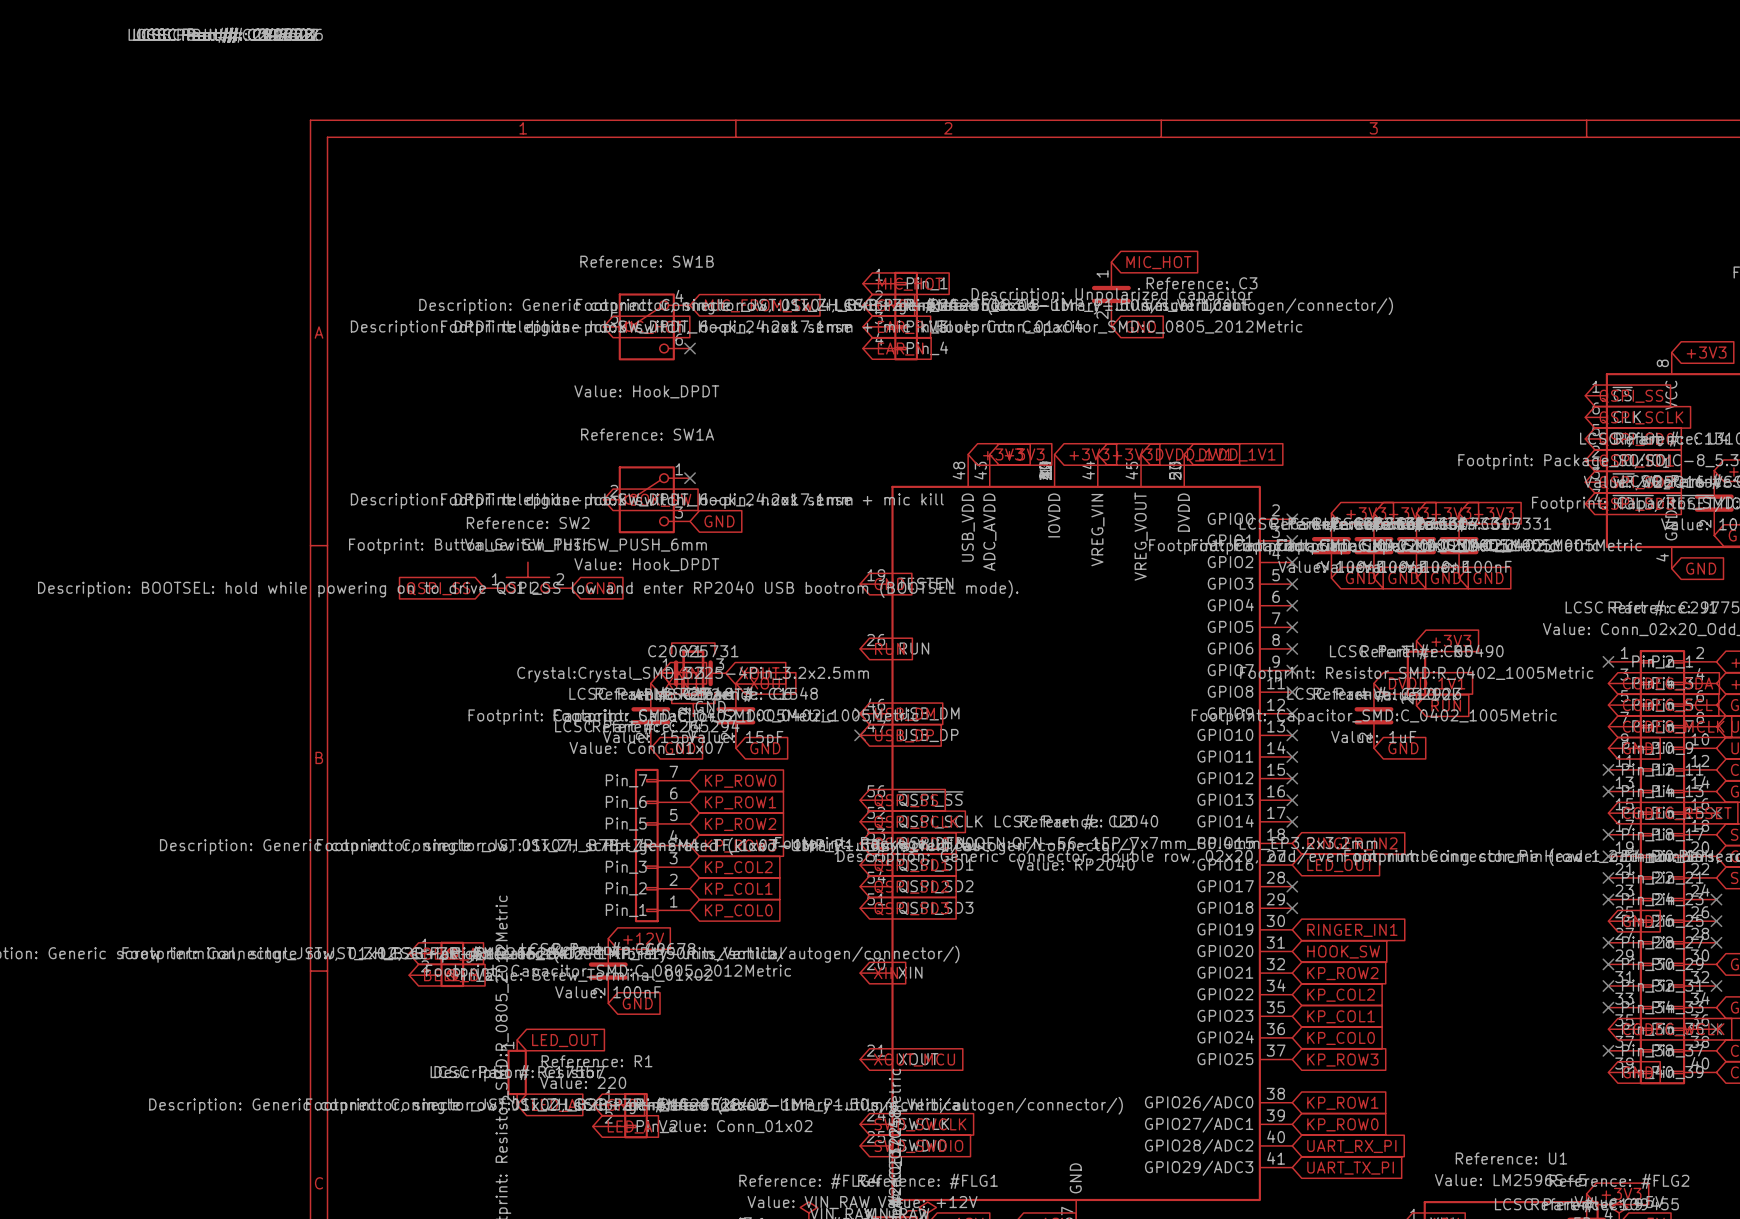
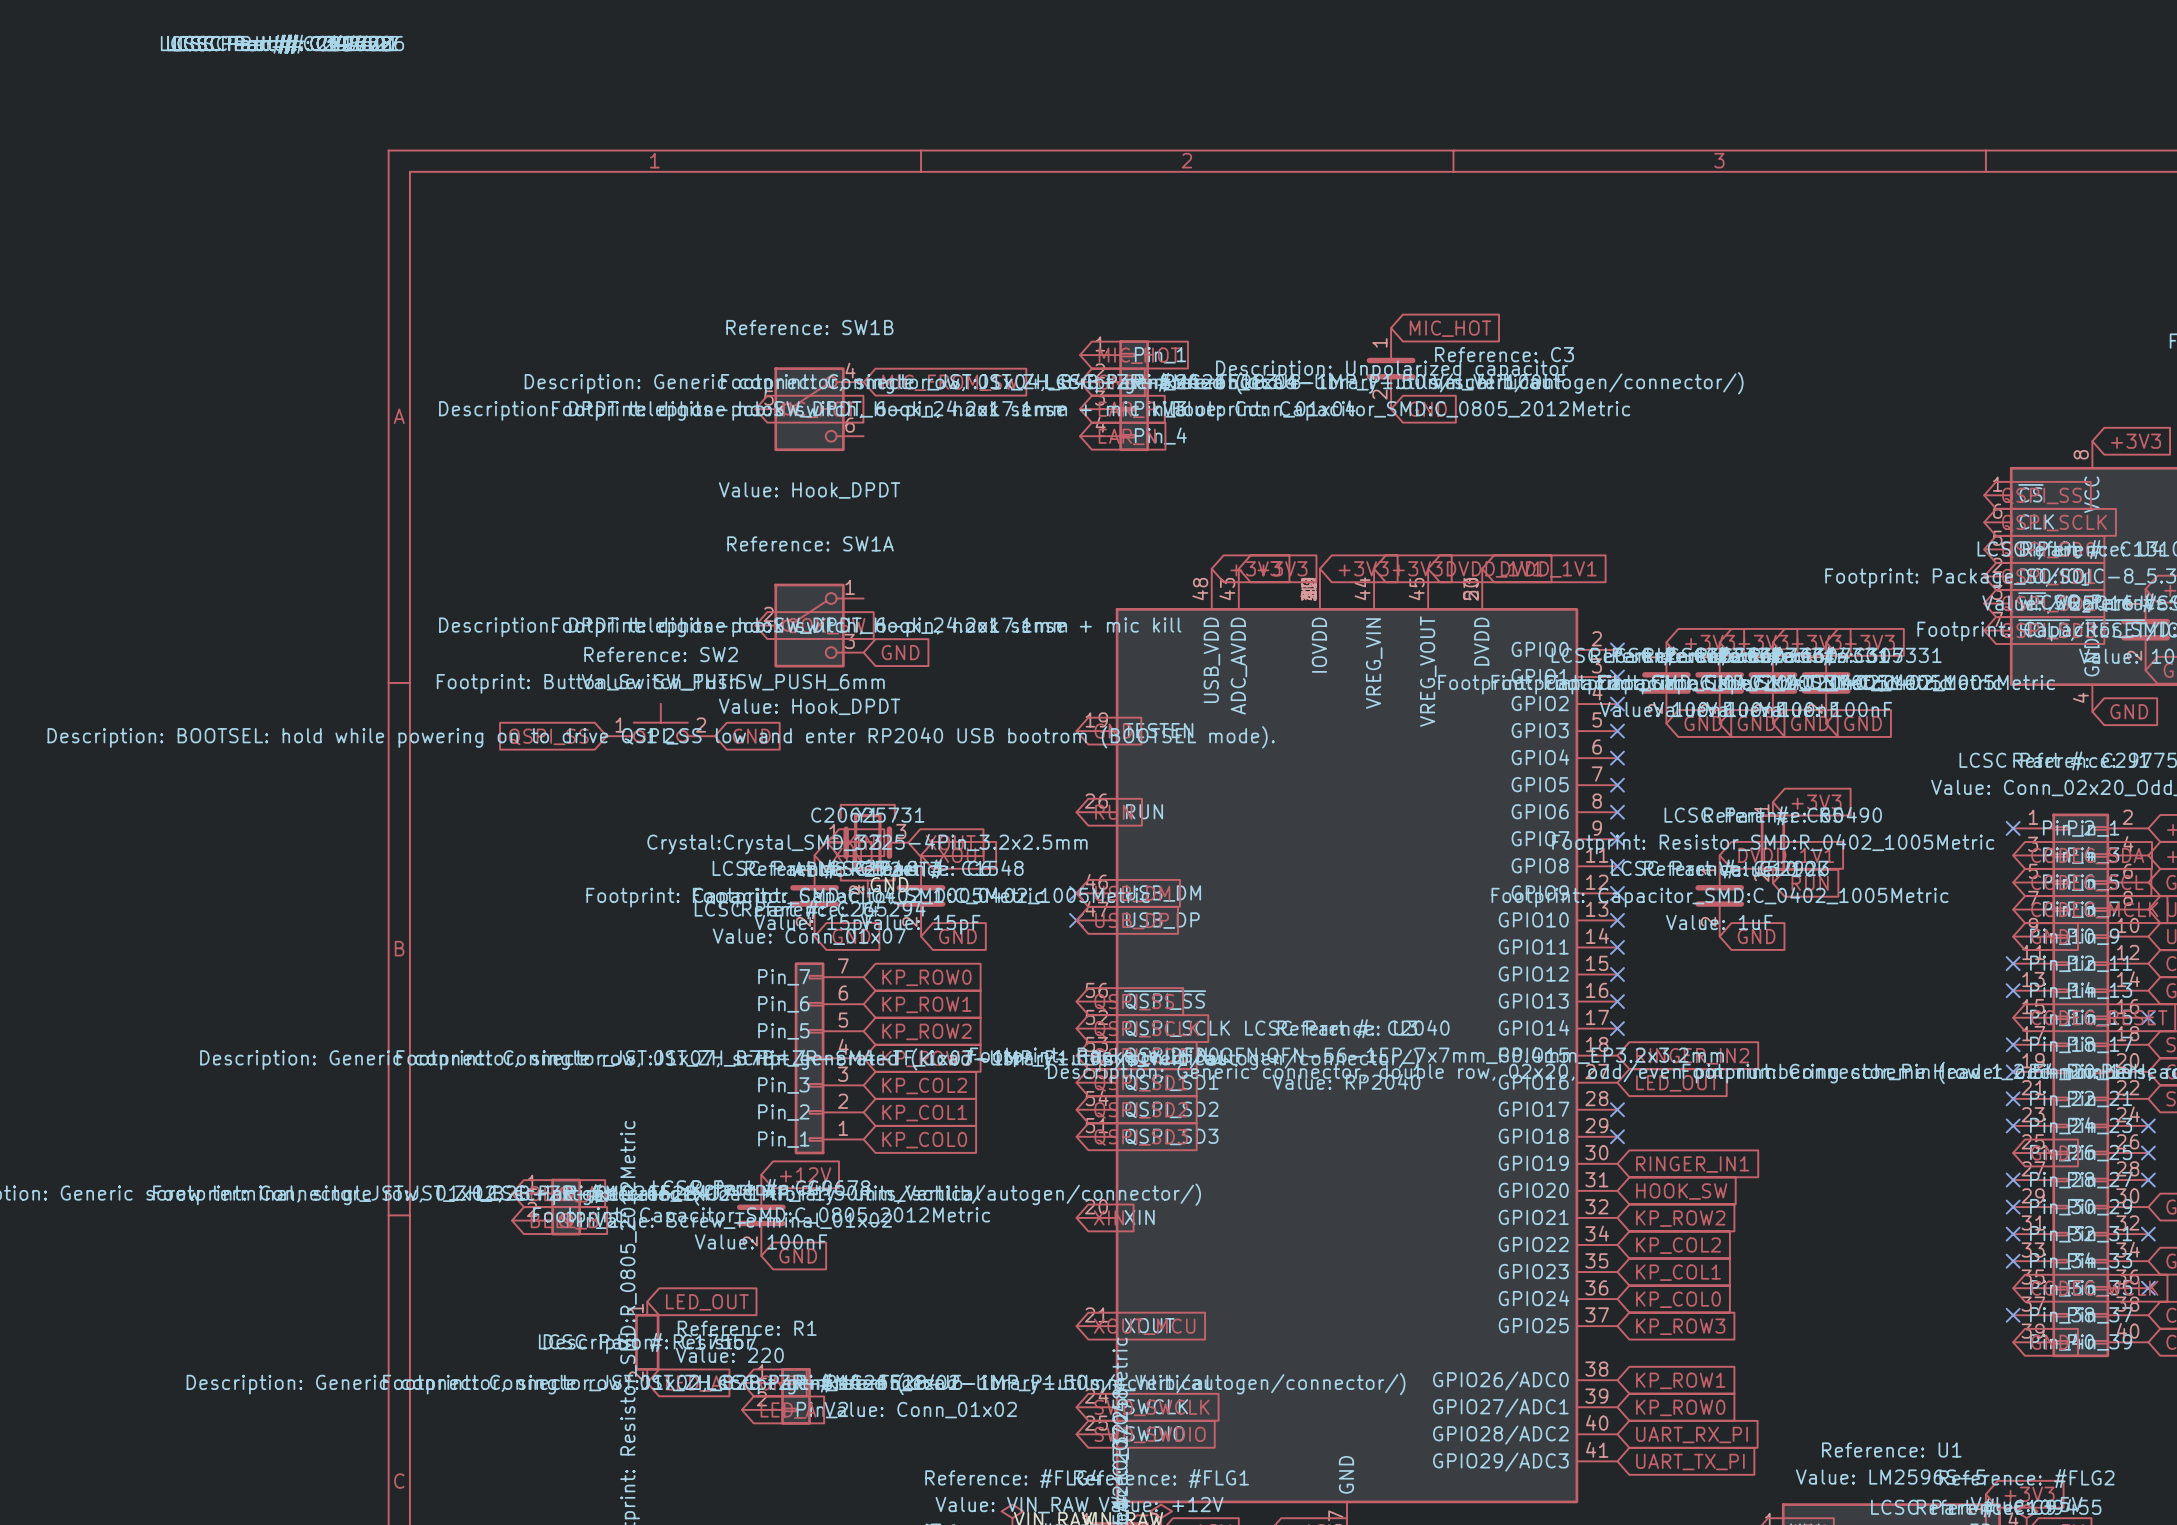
no-connect mark: (690, 348) -> none
no-connect mark: (690, 478) -> none

